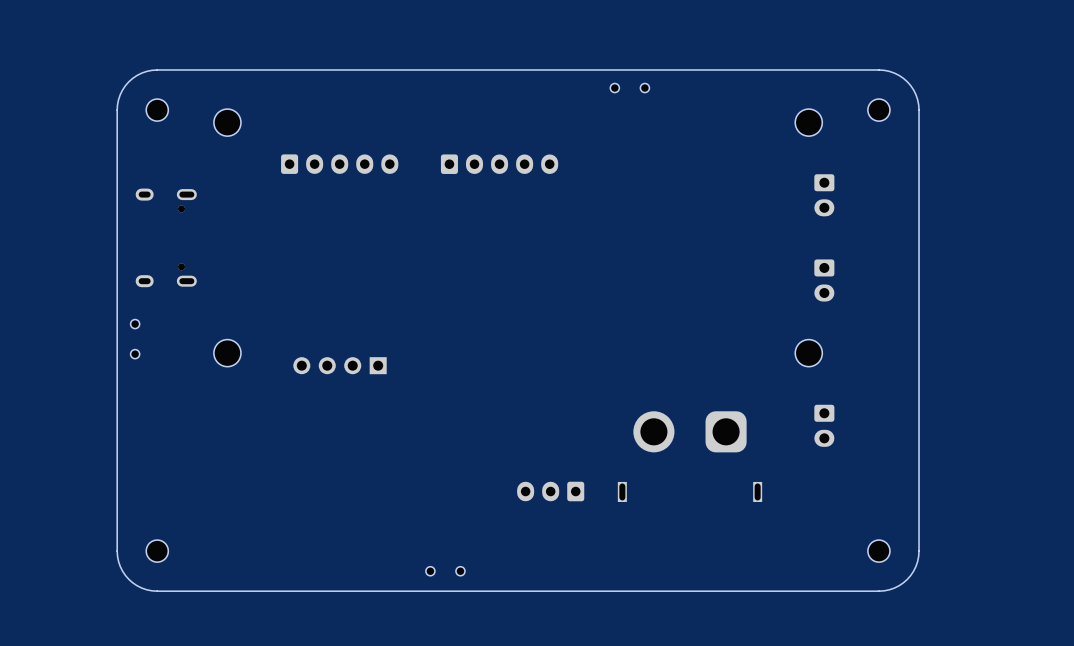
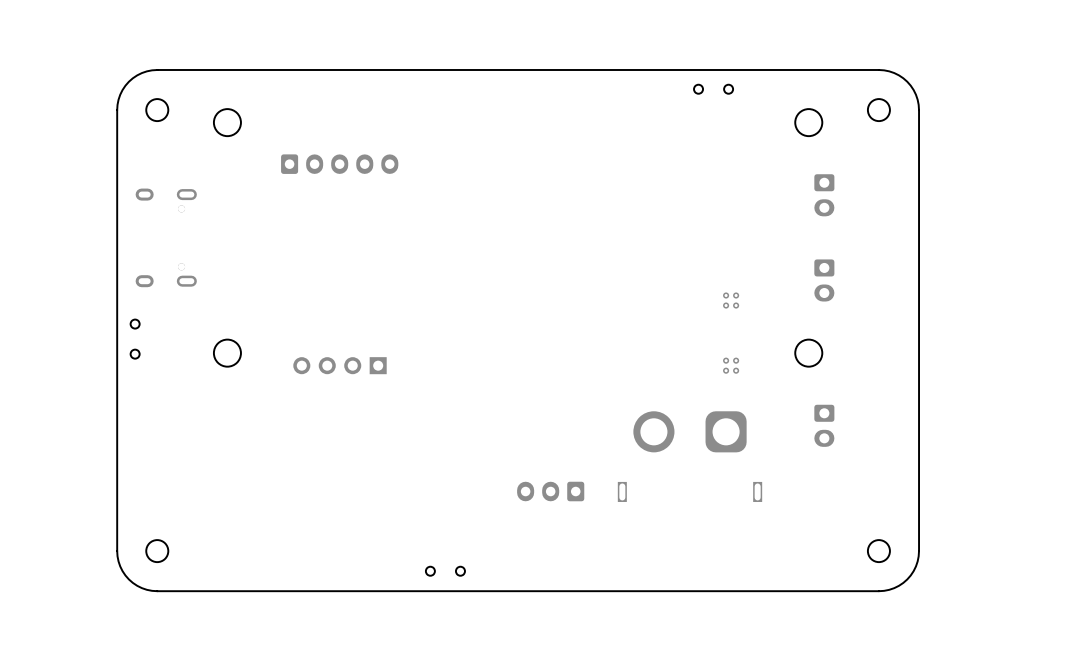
part position: (629, 88) -> (713, 89)
part: (499, 164) -> none
part: none -> (731, 300)
part: none -> (731, 365)

